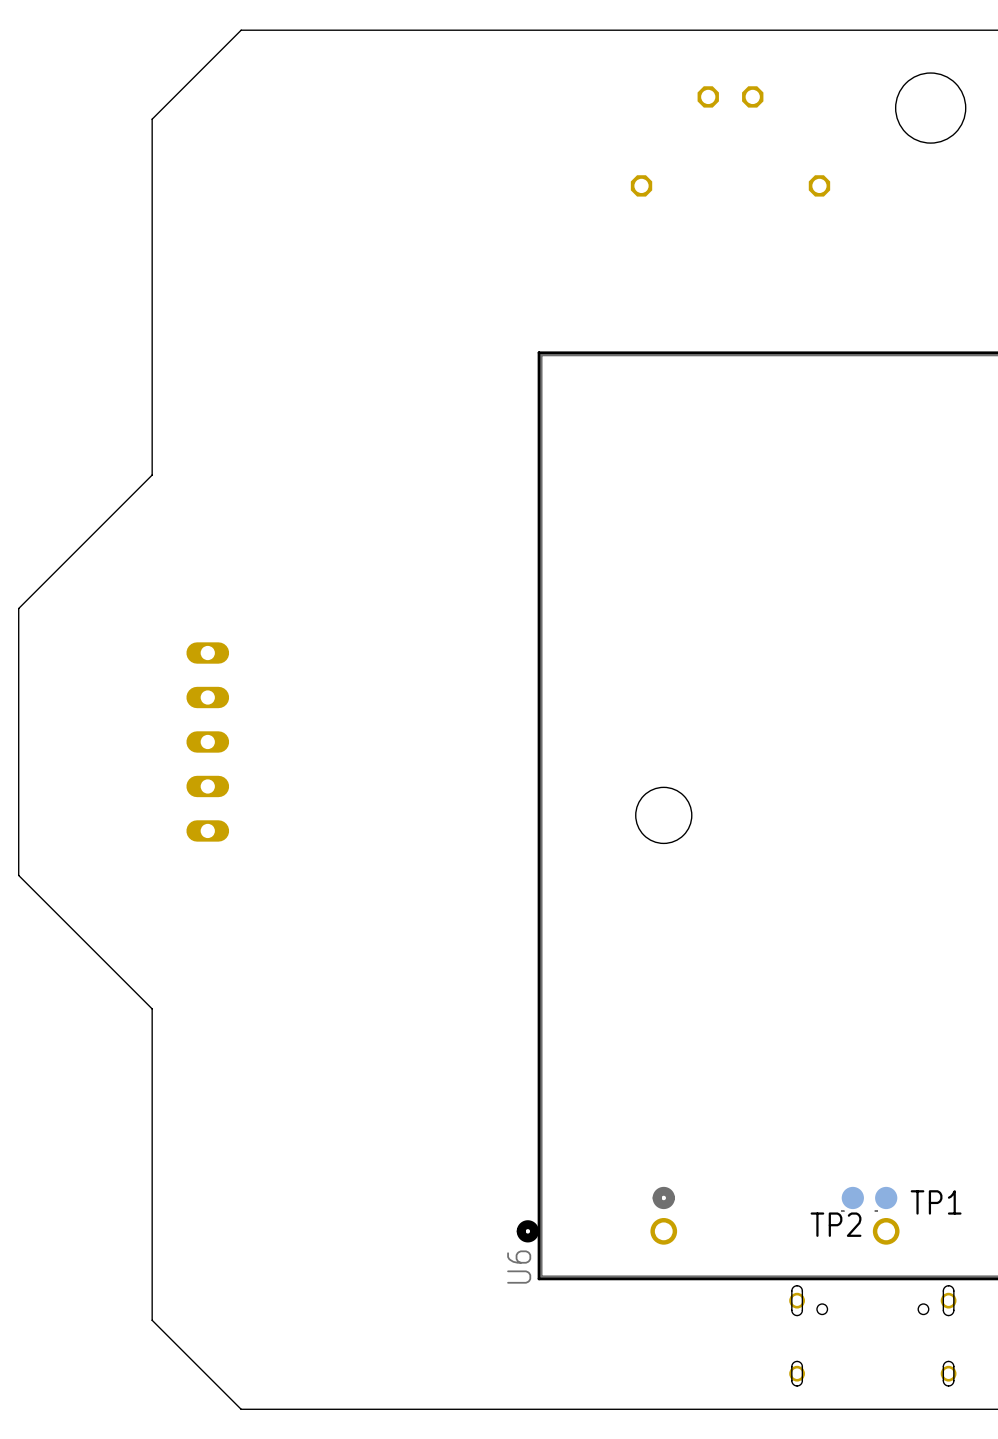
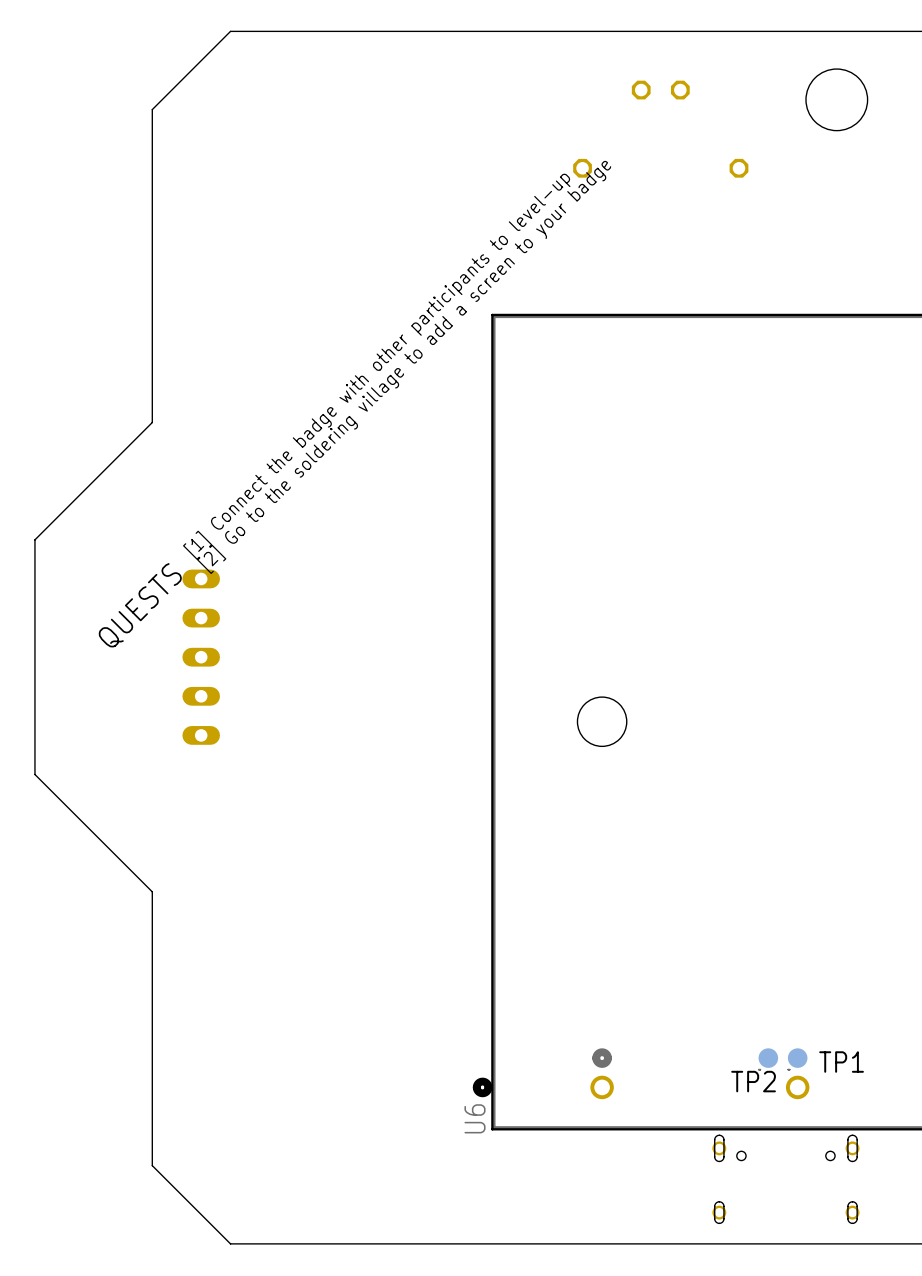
text: none -> [1] Connect the badge with other participants to level-up (376, 366)
text: none -> [2] Go to the soldering village to add a screen to your badge (404, 367)
text: none -> QUESTS (140, 605)

